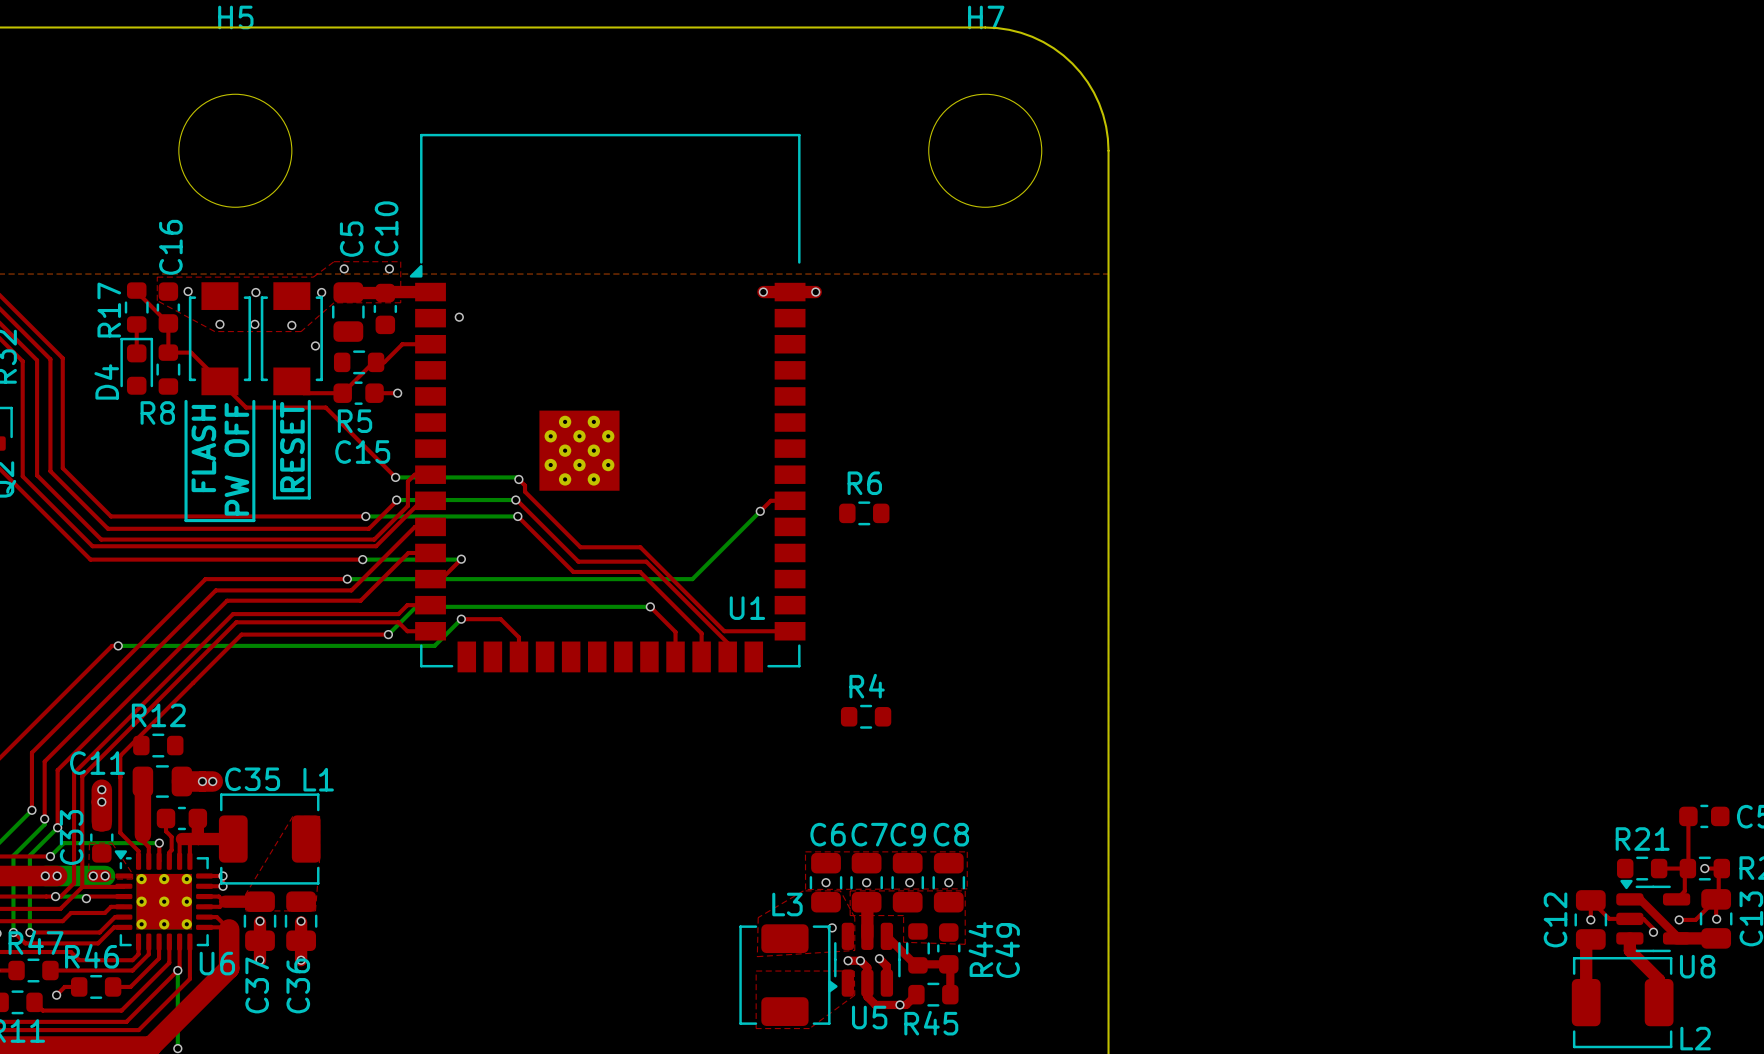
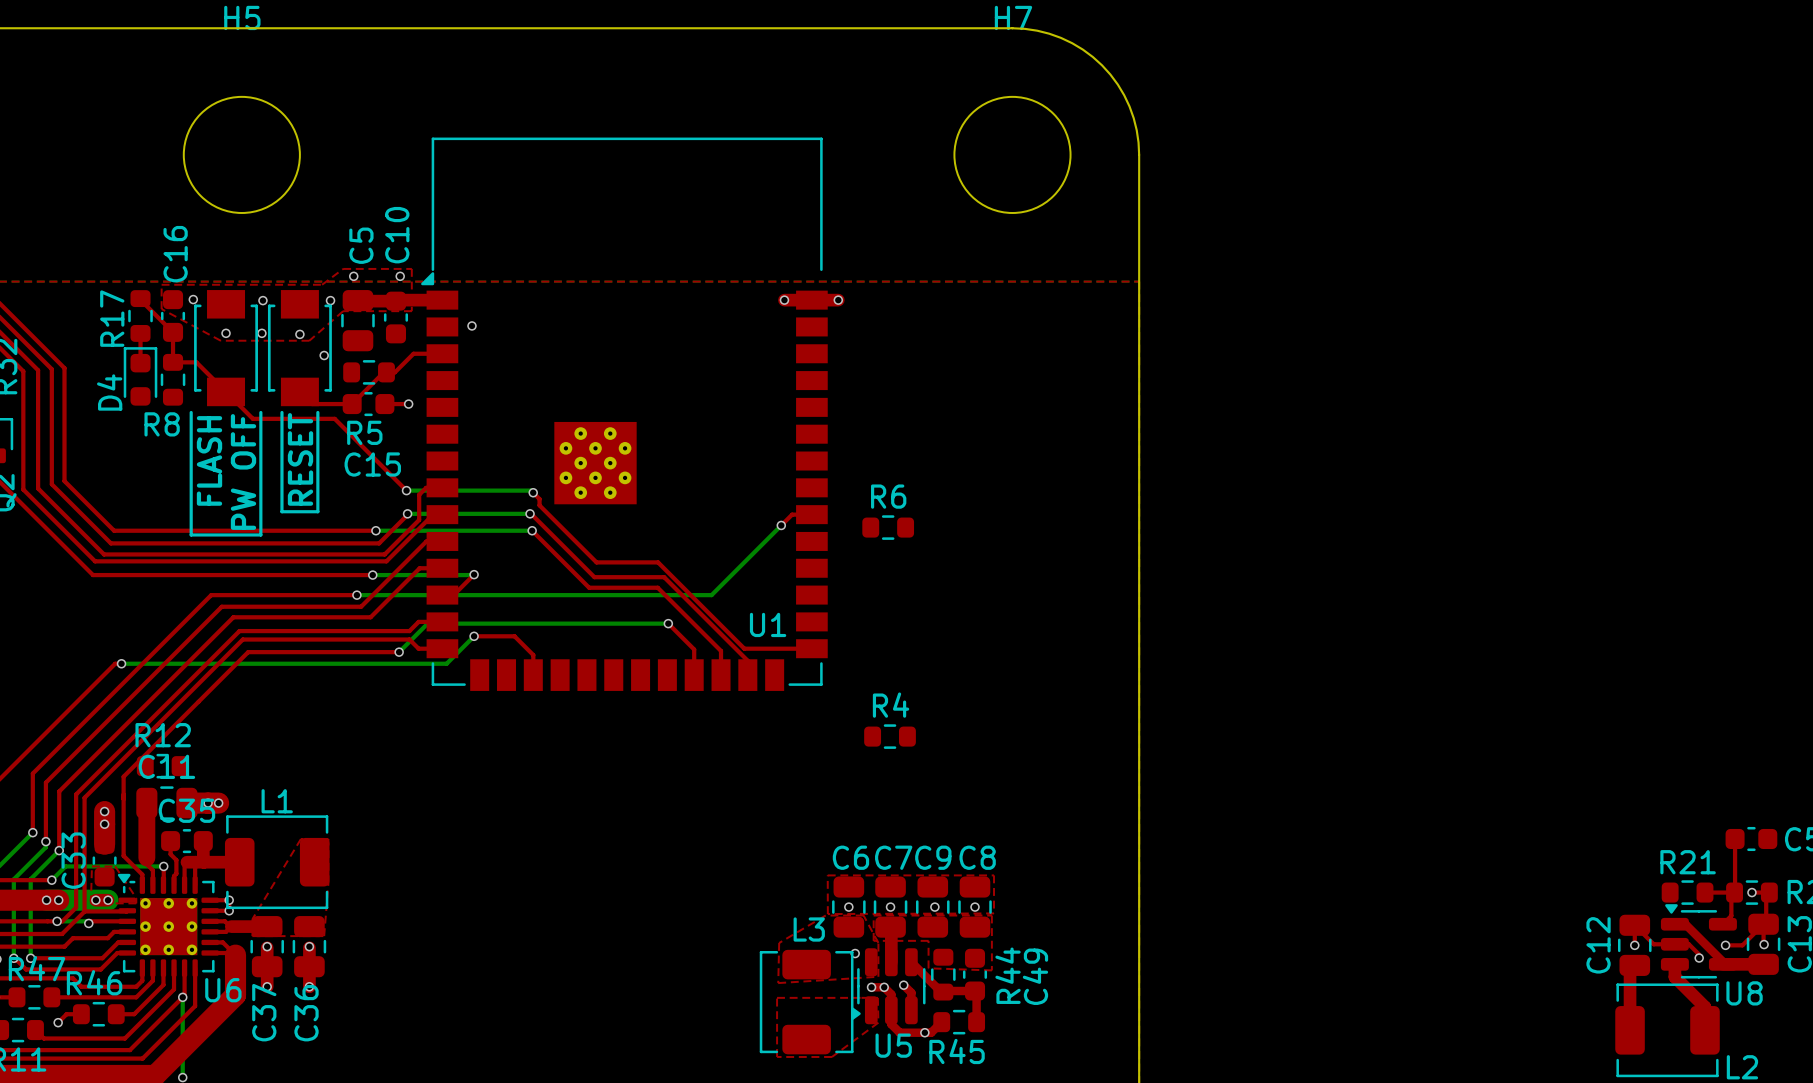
C11 name position: C11 (97, 763) -> C11 (166, 766)
C35 name position: C35 (252, 779) -> C35 (186, 810)
L1 name position: L1 (318, 779) -> L1 (277, 801)

